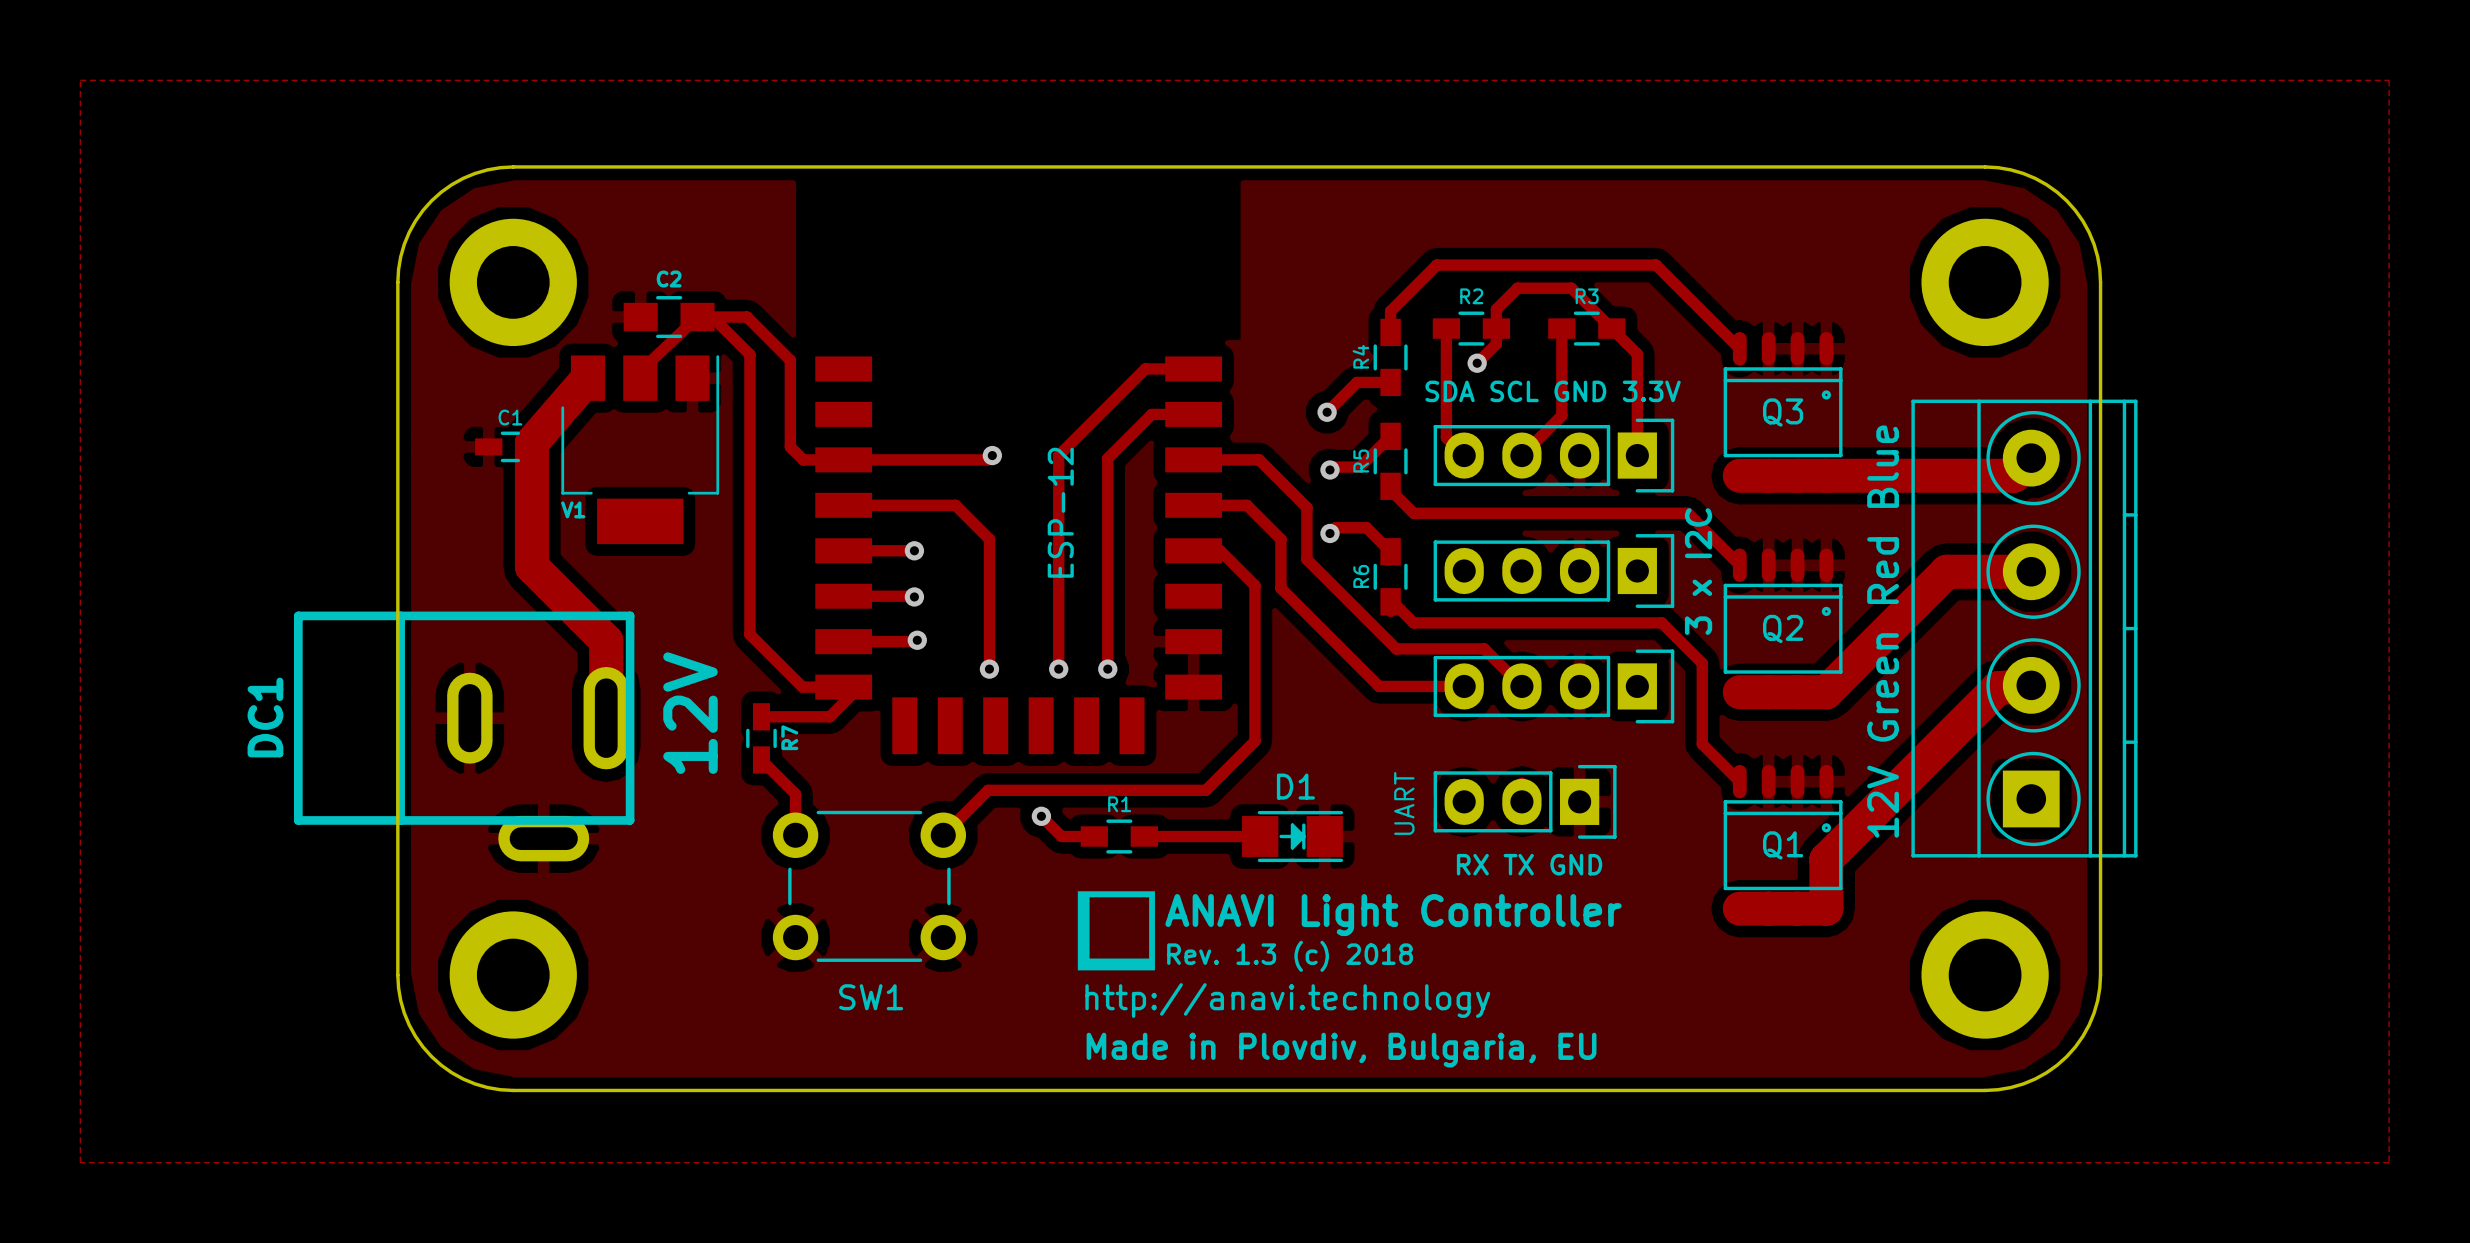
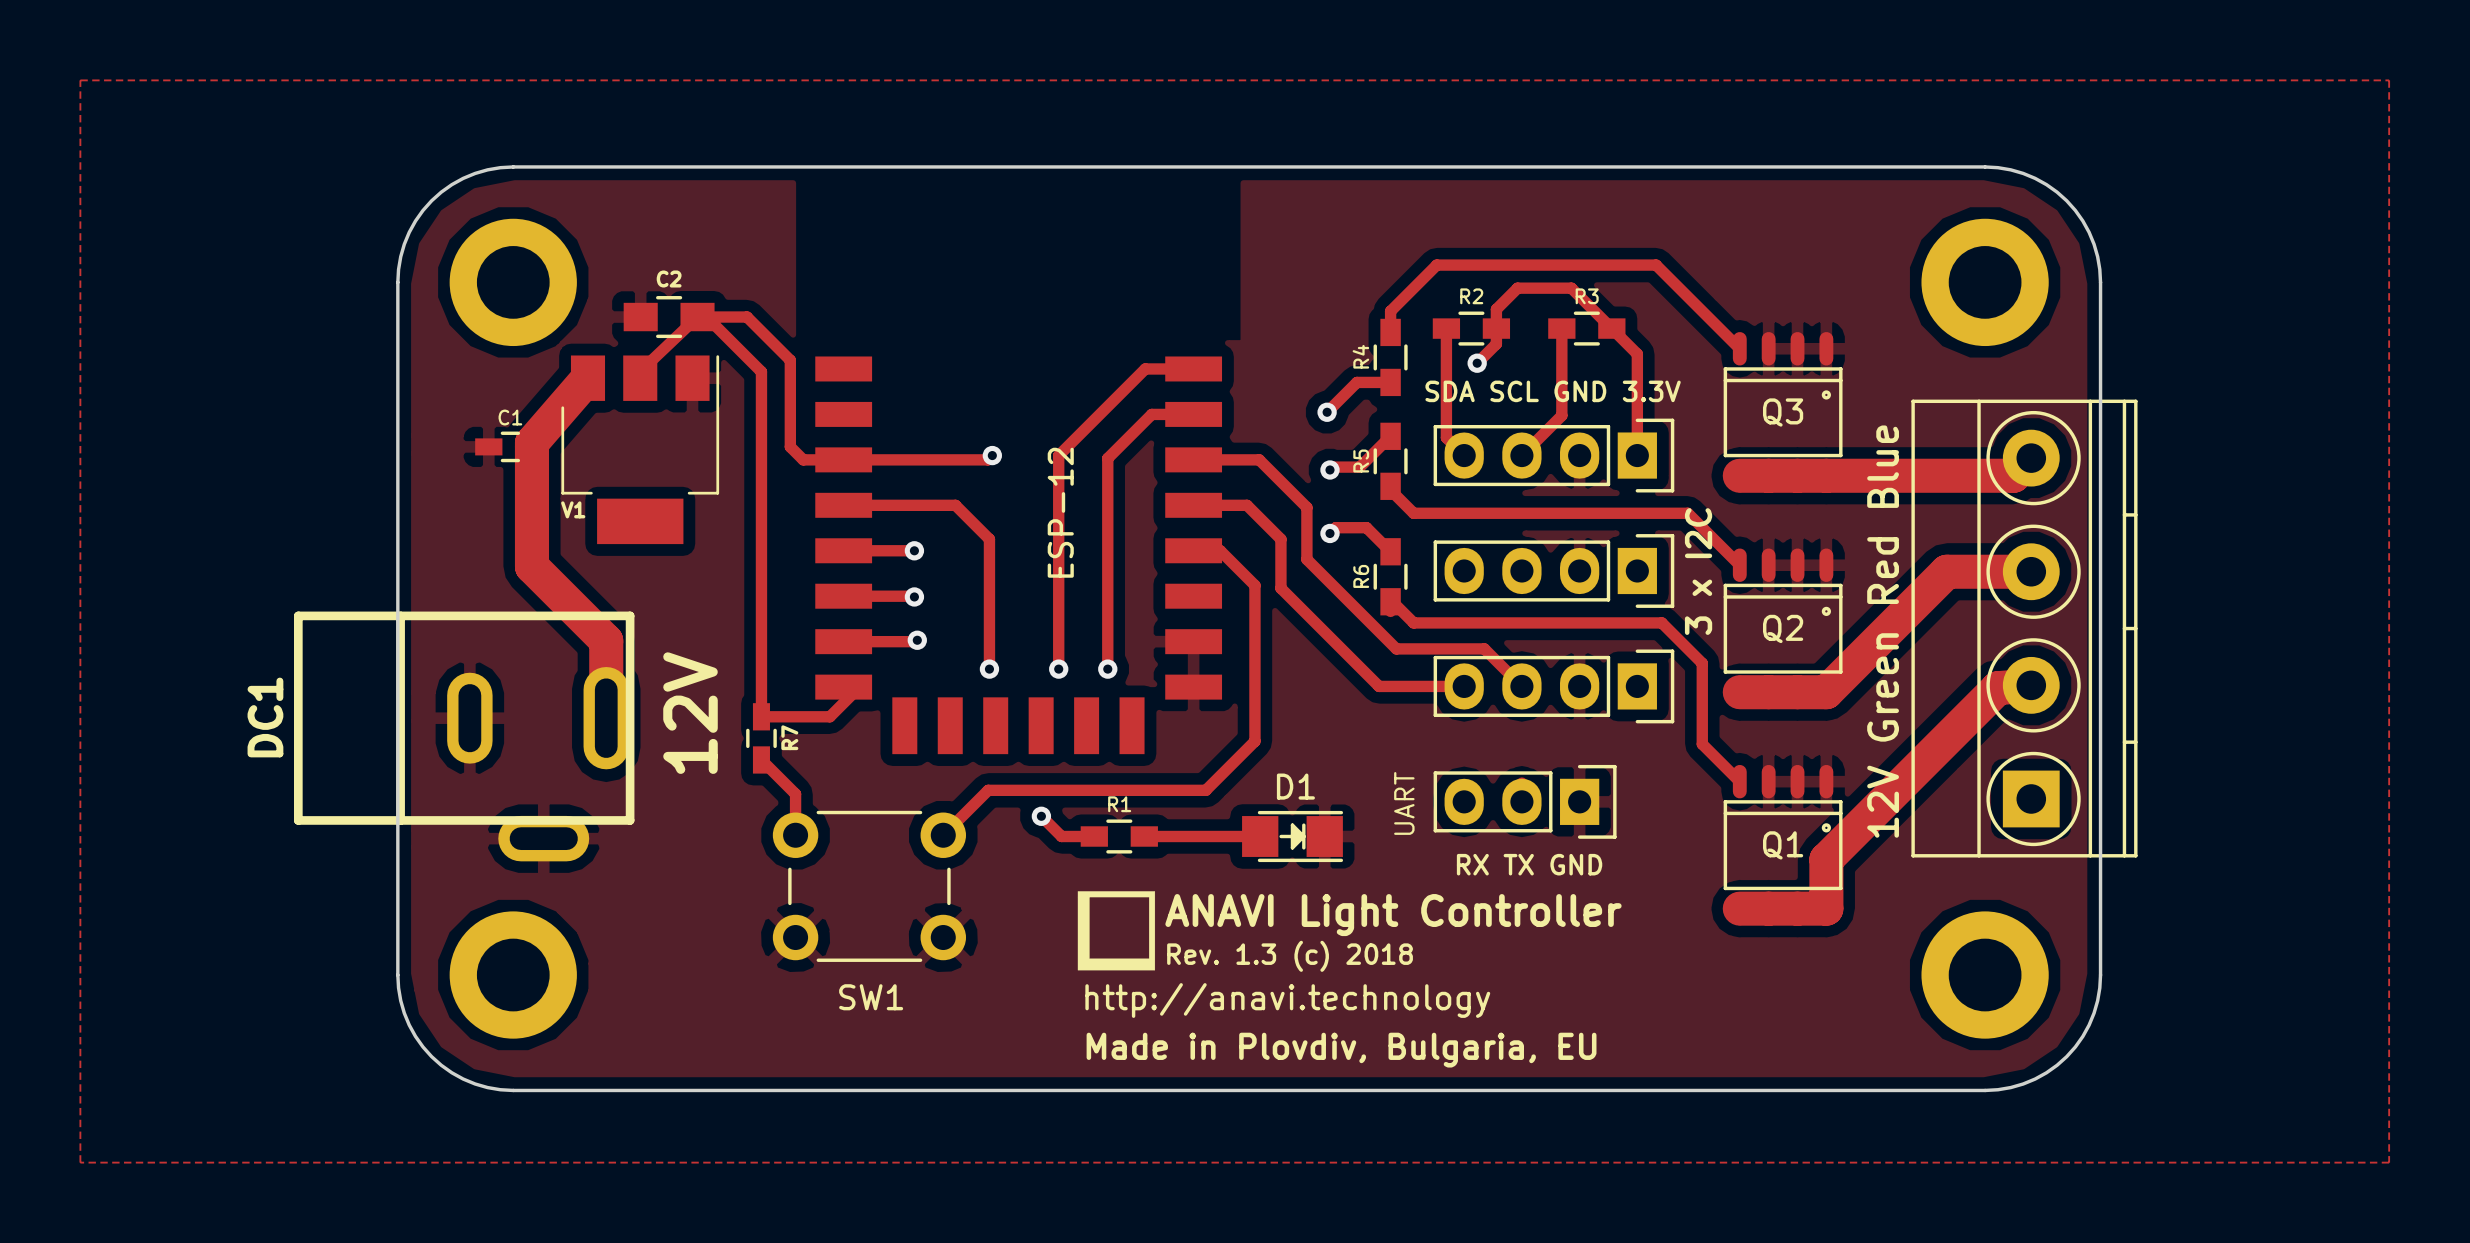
track: none -> (706, 317) (761, 371) (761, 716)
track: (712, 317) (749, 354) (749, 634) (802, 687) (859, 687) -> none

